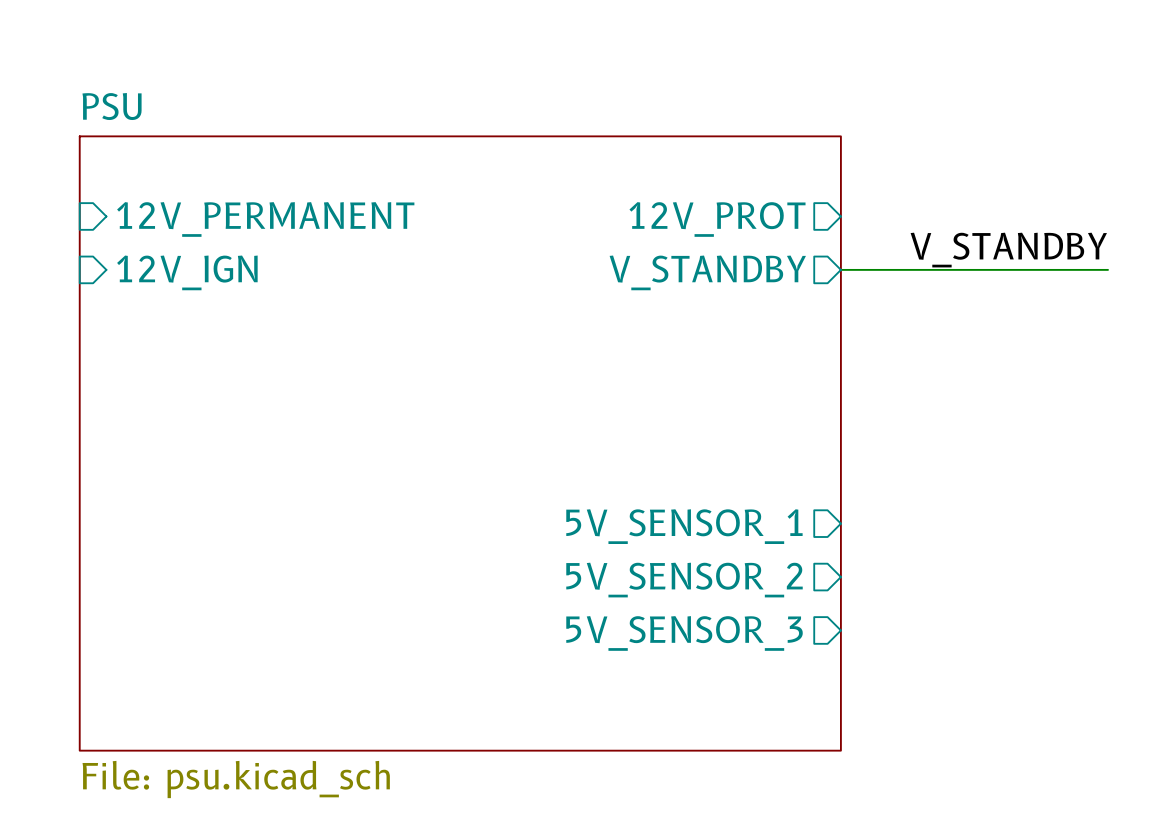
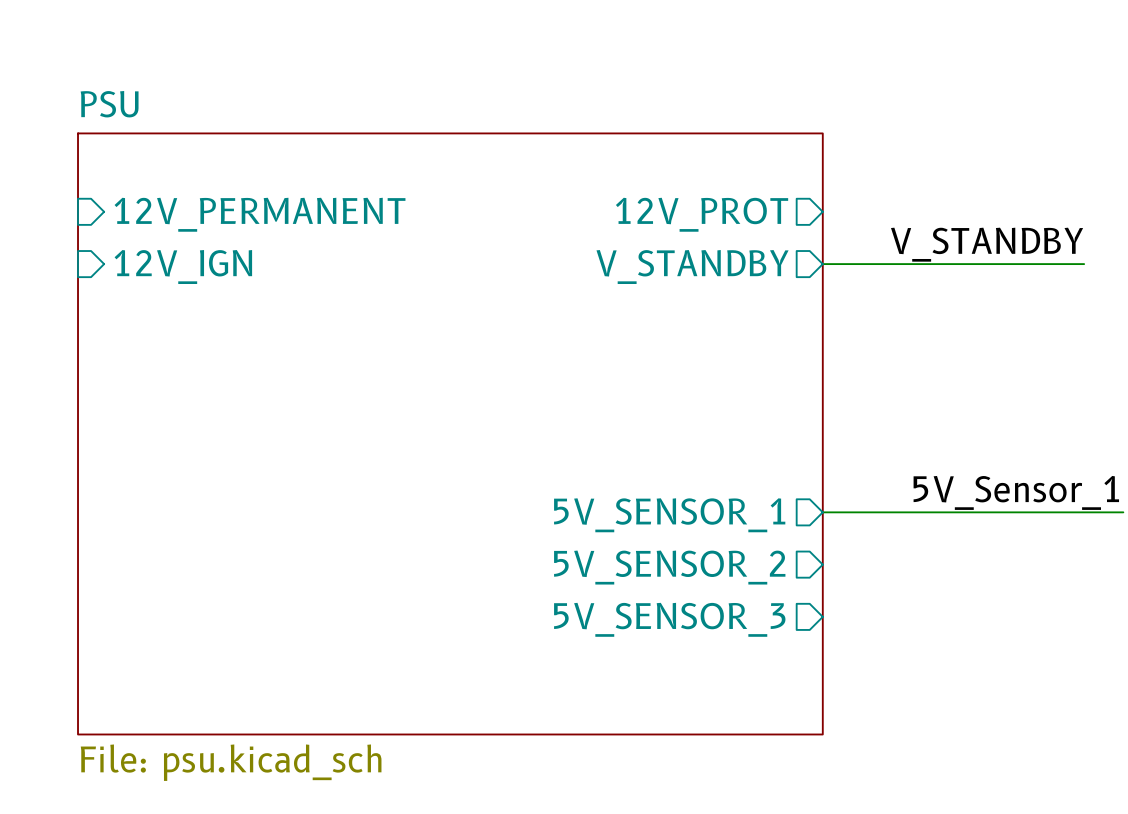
label: none -> 5V_Sensor_1 (1016, 492)
wire: none -> (822, 512) (1123, 512)

